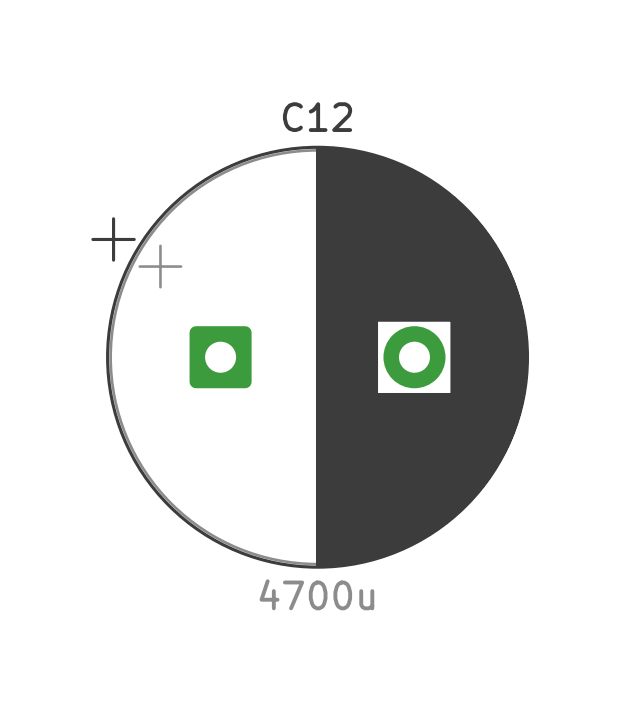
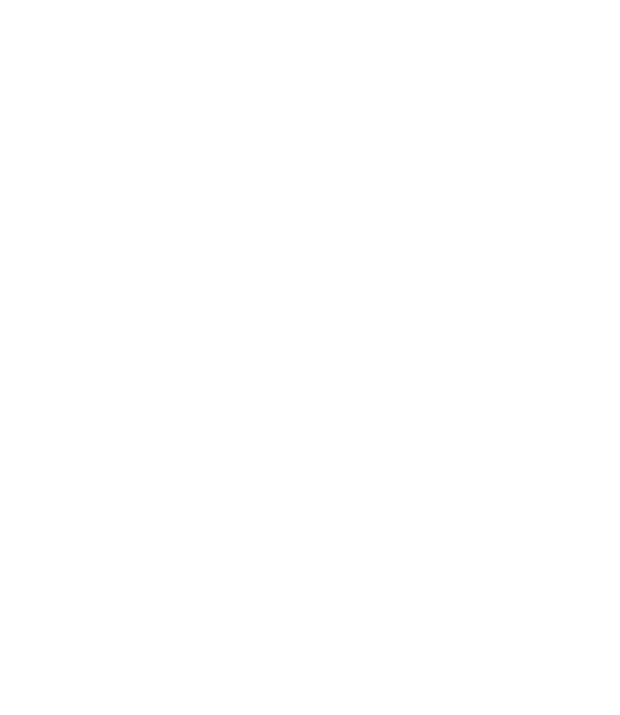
C12: 4700u (310, 357) -> none

